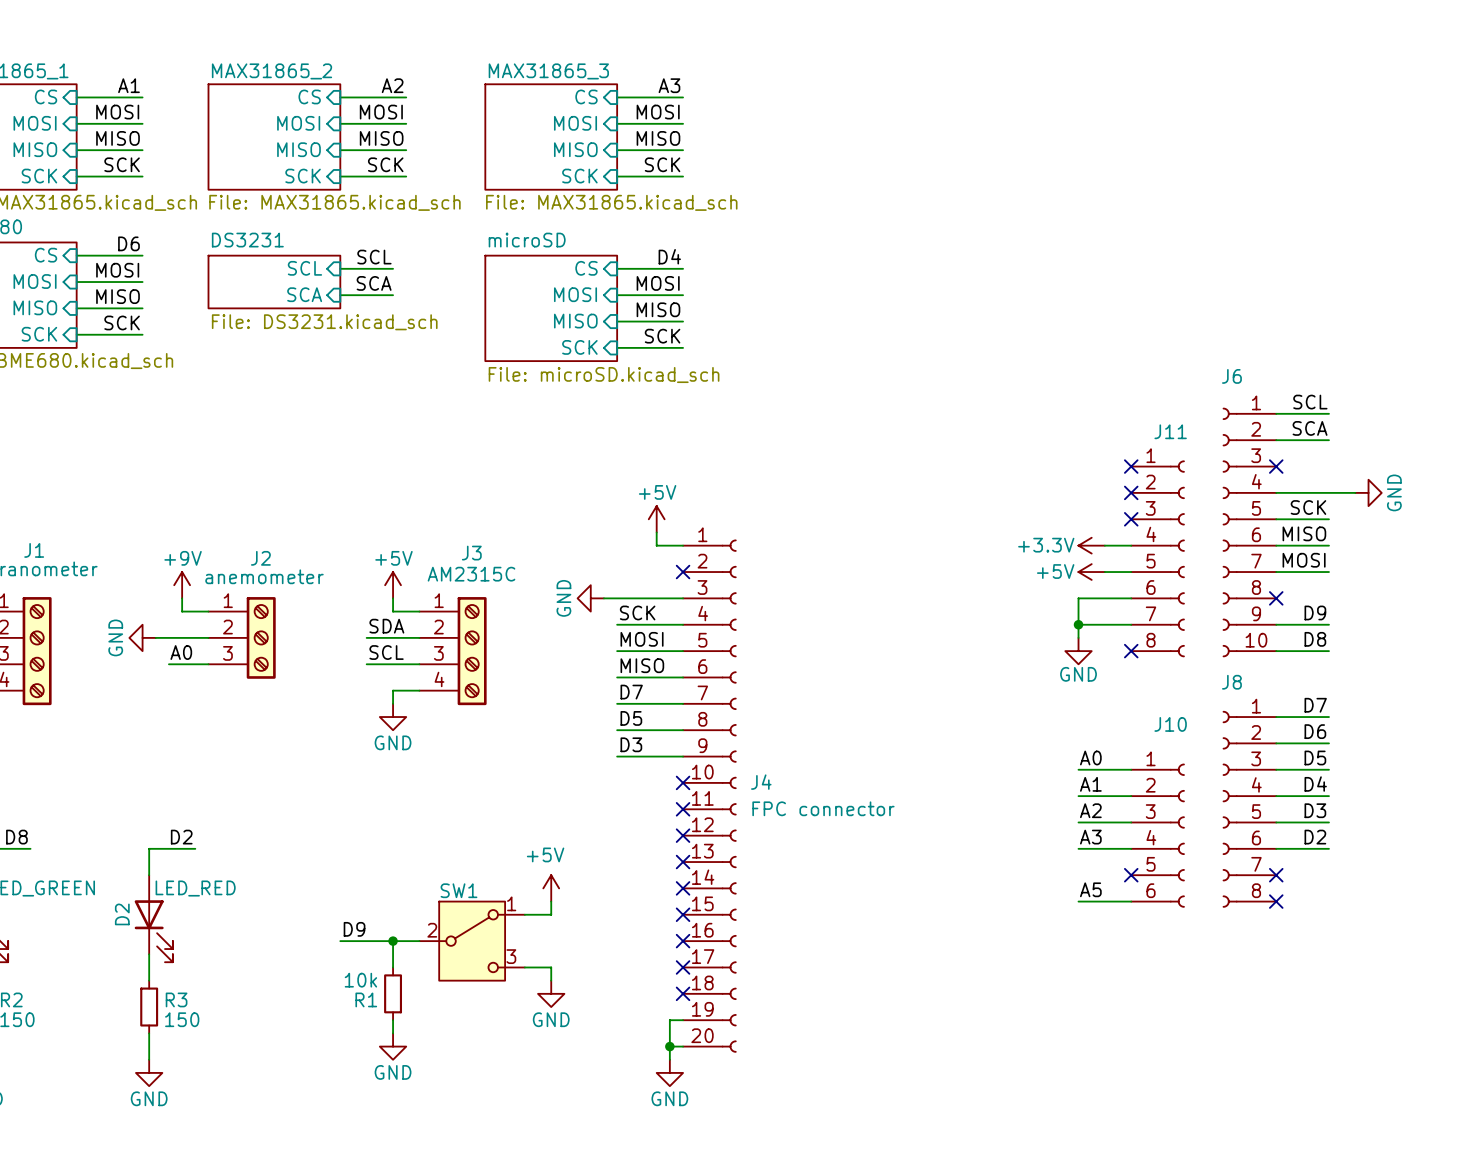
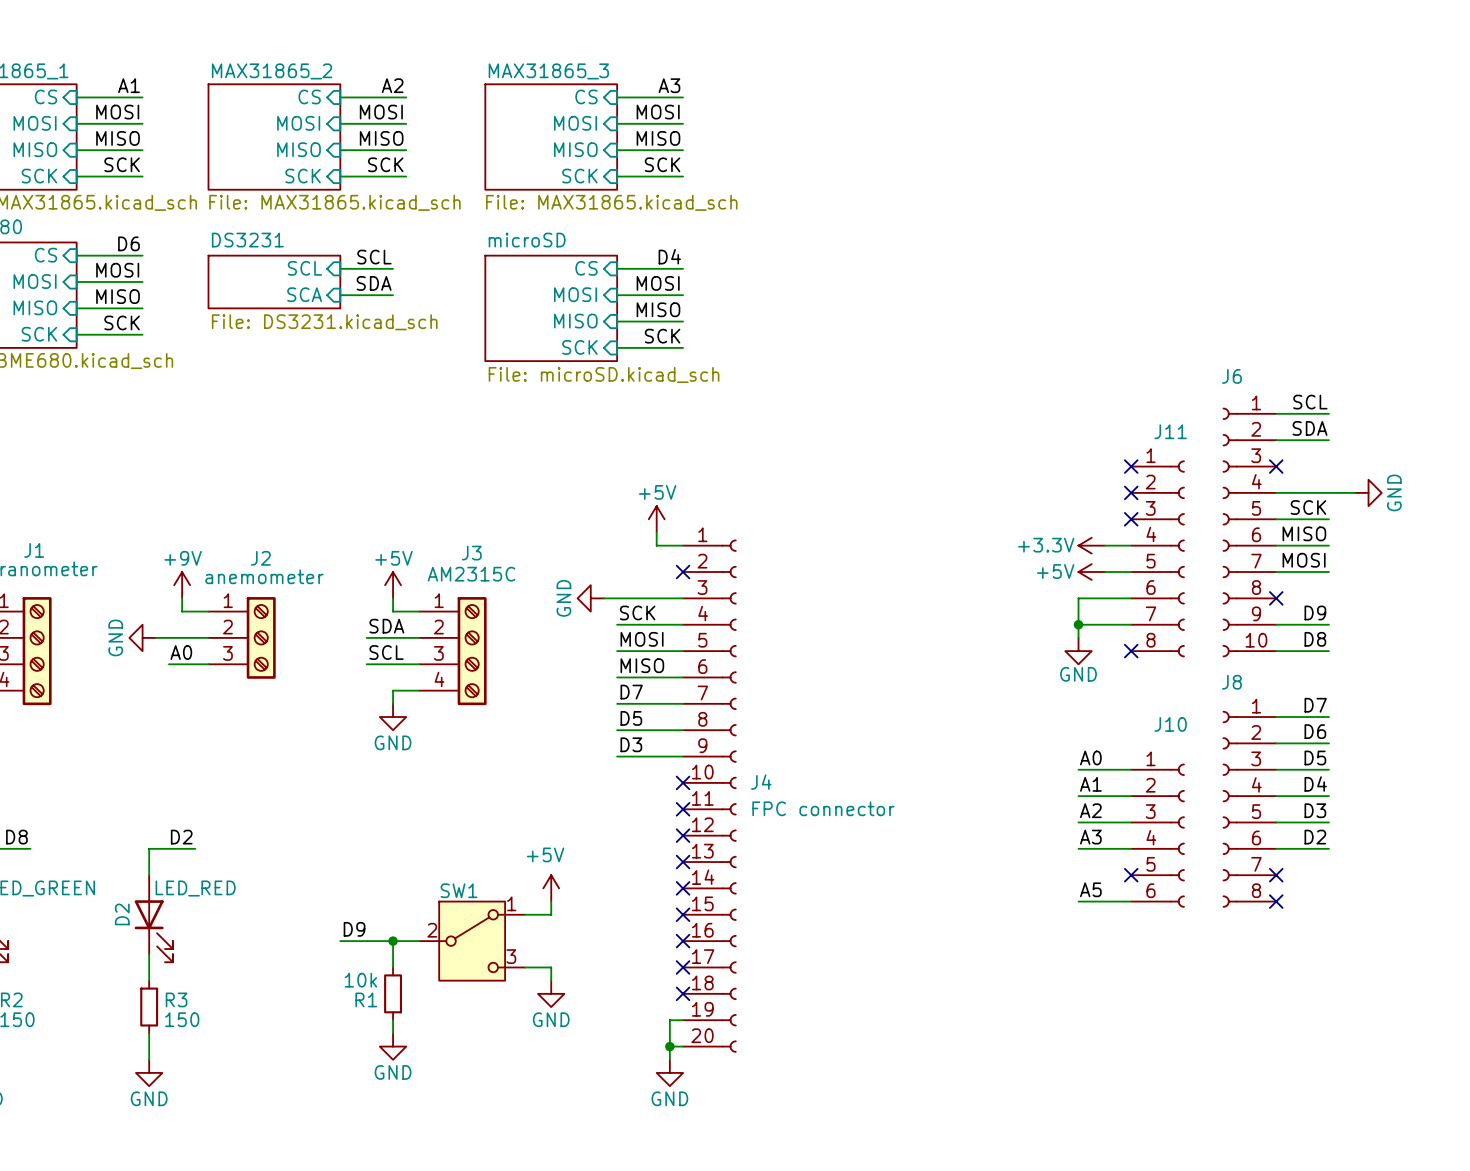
label: SCA (374, 283) -> SDA (374, 283)
label: SCA (1310, 428) -> SDA (1310, 428)

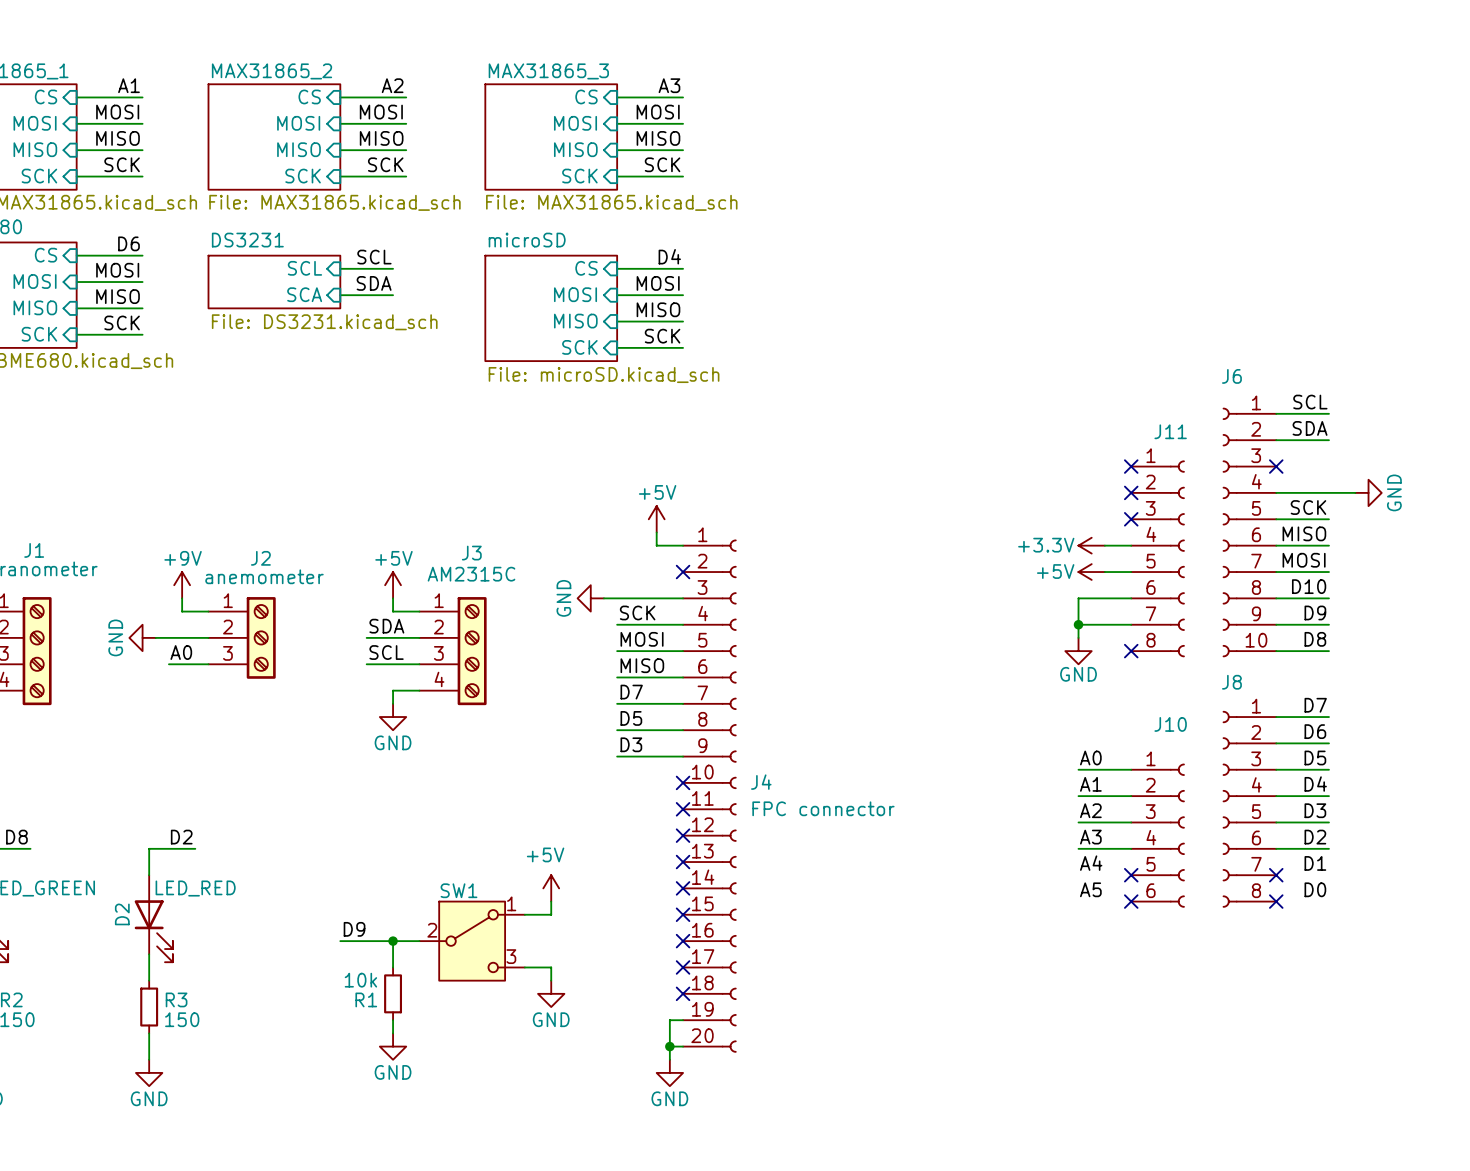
label: none -> D10 (1309, 586)
wire: none -> (1276, 598) (1328, 598)
no-connect mark: (1276, 598) -> none
label: none -> A4 (1091, 863)
label: none -> D1 (1315, 863)
label: none -> D0 (1315, 889)
wire: (1078, 901) (1131, 901) -> none
no-connect mark: none -> (1131, 901)

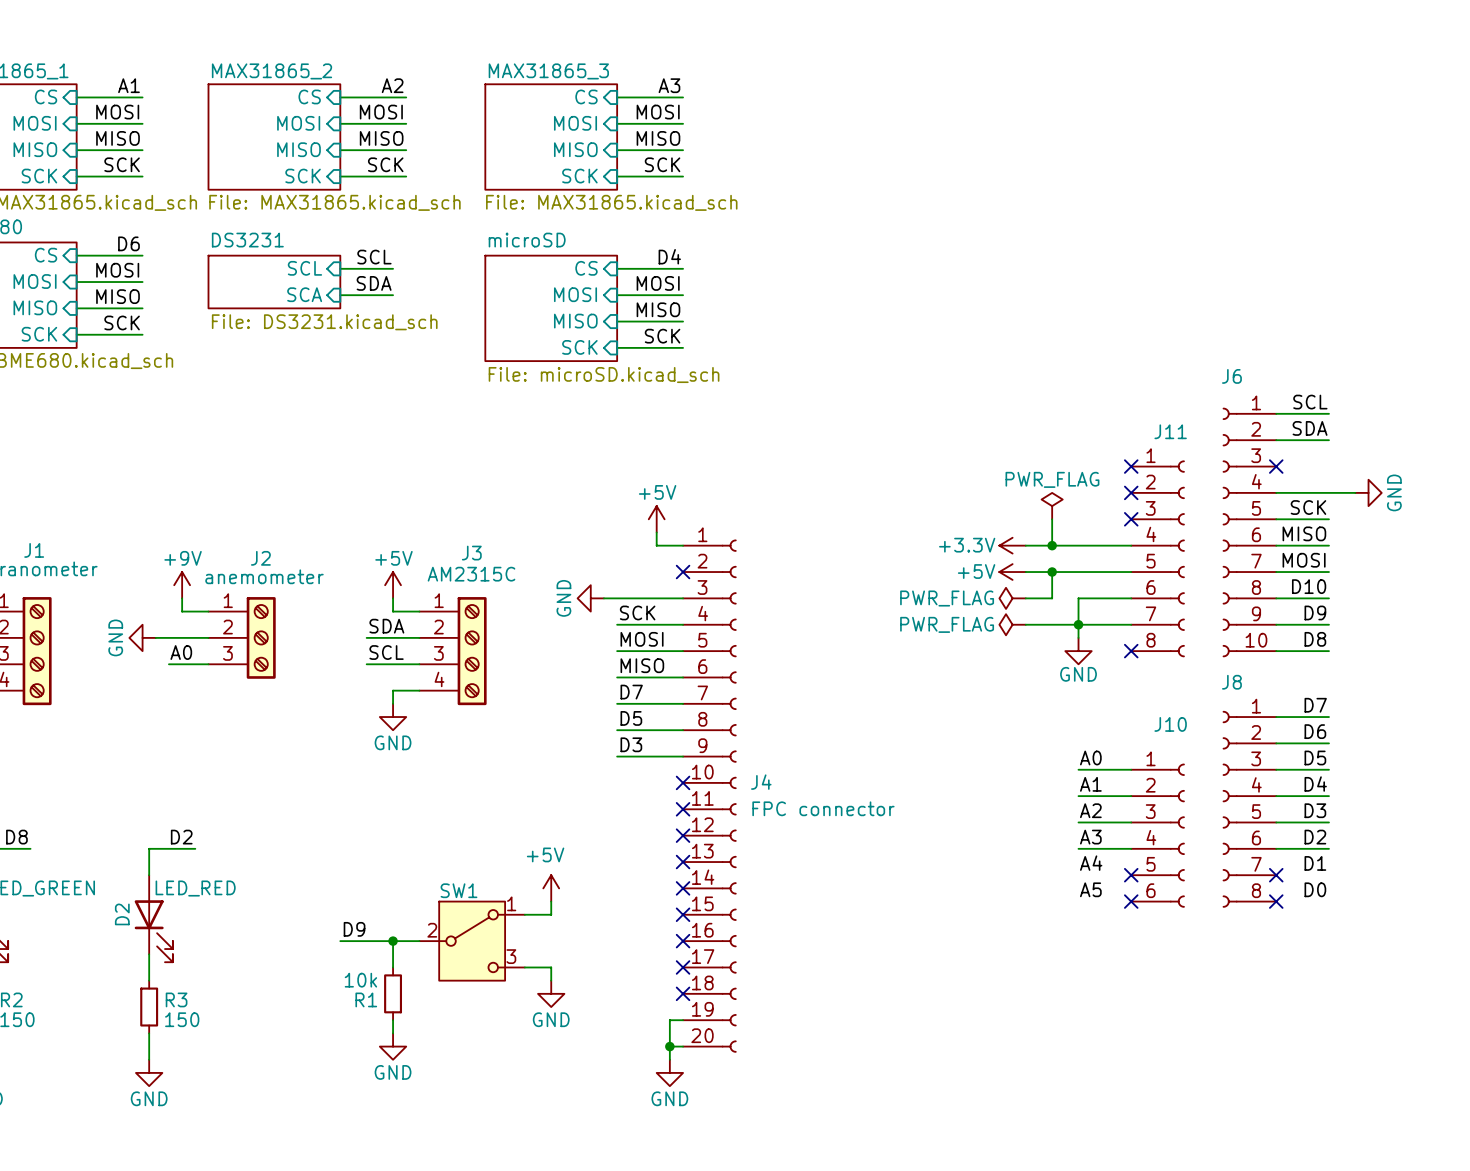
power symbol: none -> PWR_FLAG (1052, 506)
wire: none -> (1052, 519) (1052, 545)
wire: none -> (1025, 545) (1104, 545)
junction: none -> (1052, 545)
power symbol position: +3.3V (1091, 545) -> +3.3V (1012, 545)
wire: none -> (1025, 572) (1104, 572)
wire: none -> (1052, 572) (1052, 598) (1025, 598)
junction: none -> (1052, 572)
power symbol position: +5V (1091, 572) -> +5V (1012, 572)
power symbol: none -> PWR_FLAG (1012, 598)
power symbol: none -> PWR_FLAG (1012, 624)
wire: none -> (1025, 624) (1078, 624)

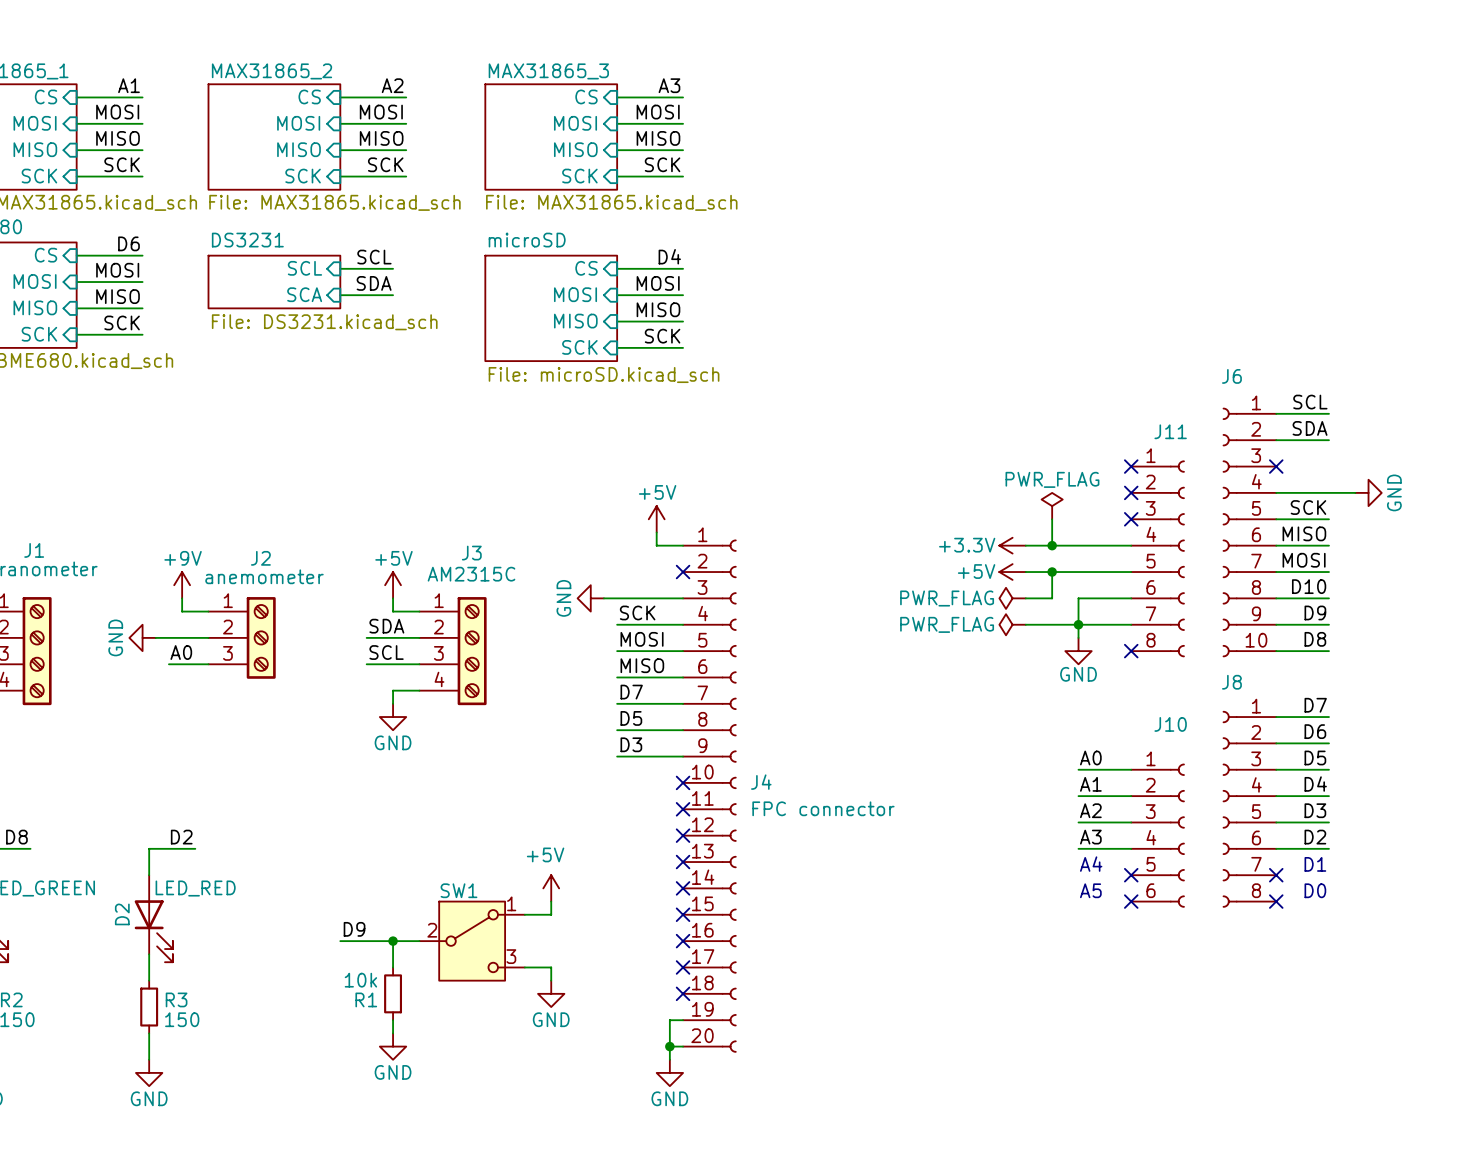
label: A4 (1091, 863) -> none
label: D1 (1315, 863) -> none
text: none -> A4 (1091, 864)
text: none -> D1 (1315, 864)
label: A5 (1090, 889) -> none
label: D0 (1315, 889) -> none
text: none -> A5 (1090, 890)
text: none -> D0 (1315, 890)

